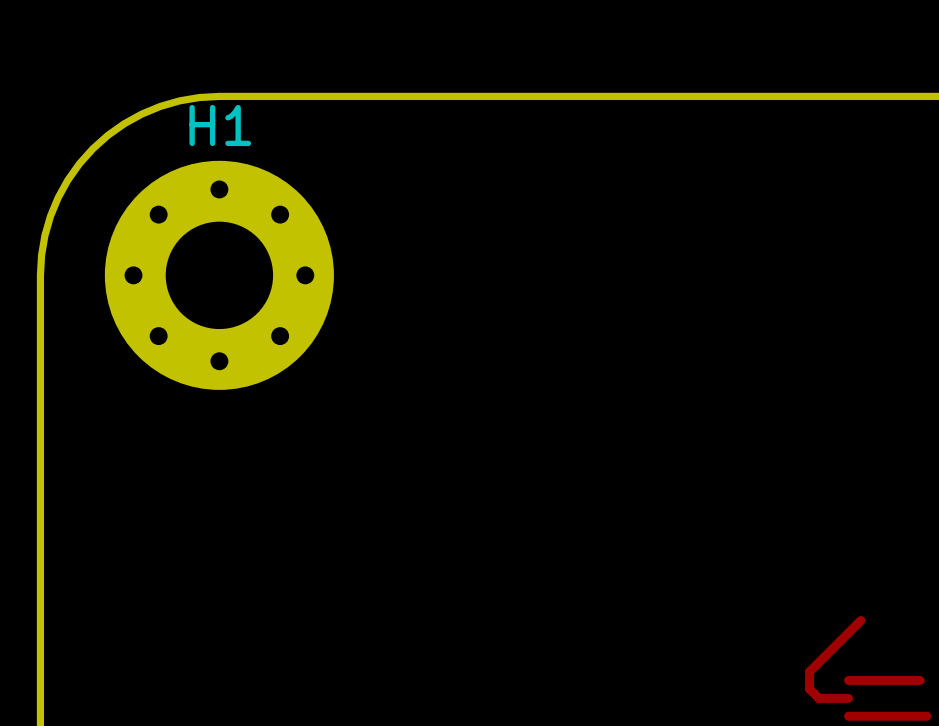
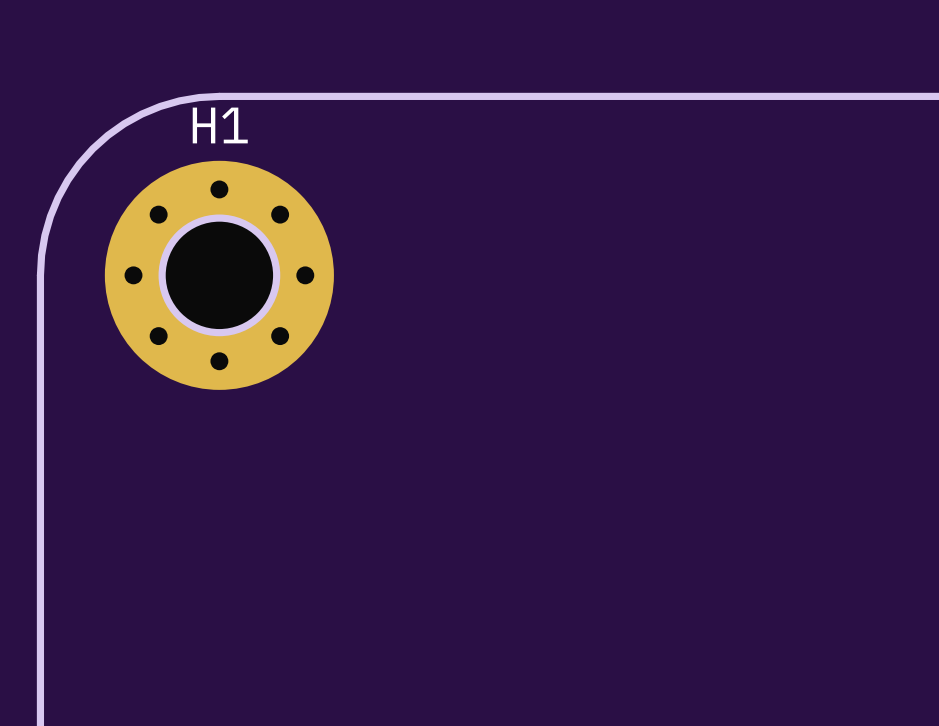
track: (860, 620) (809, 671) (809, 689) (818, 698) (848, 698) -> none
track: (848, 680) (920, 680) -> none
track: (848, 716) (926, 716) -> none

